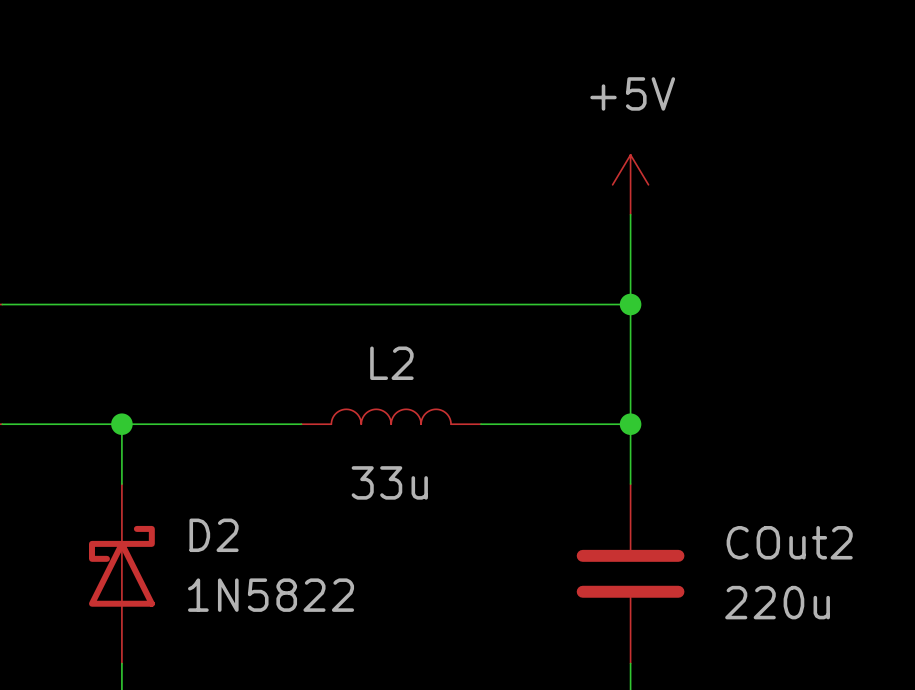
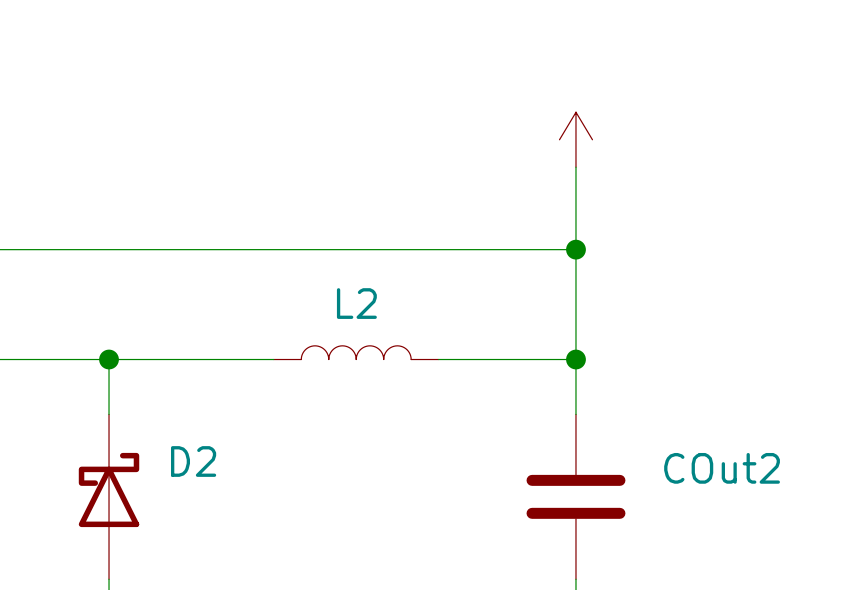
power symbol text: +5V (632, 93) -> none
L2 value: 33u (389, 482) -> none
D2 value: 1N5822 (271, 595) -> none
COut2 value: 220u (777, 602) -> none

